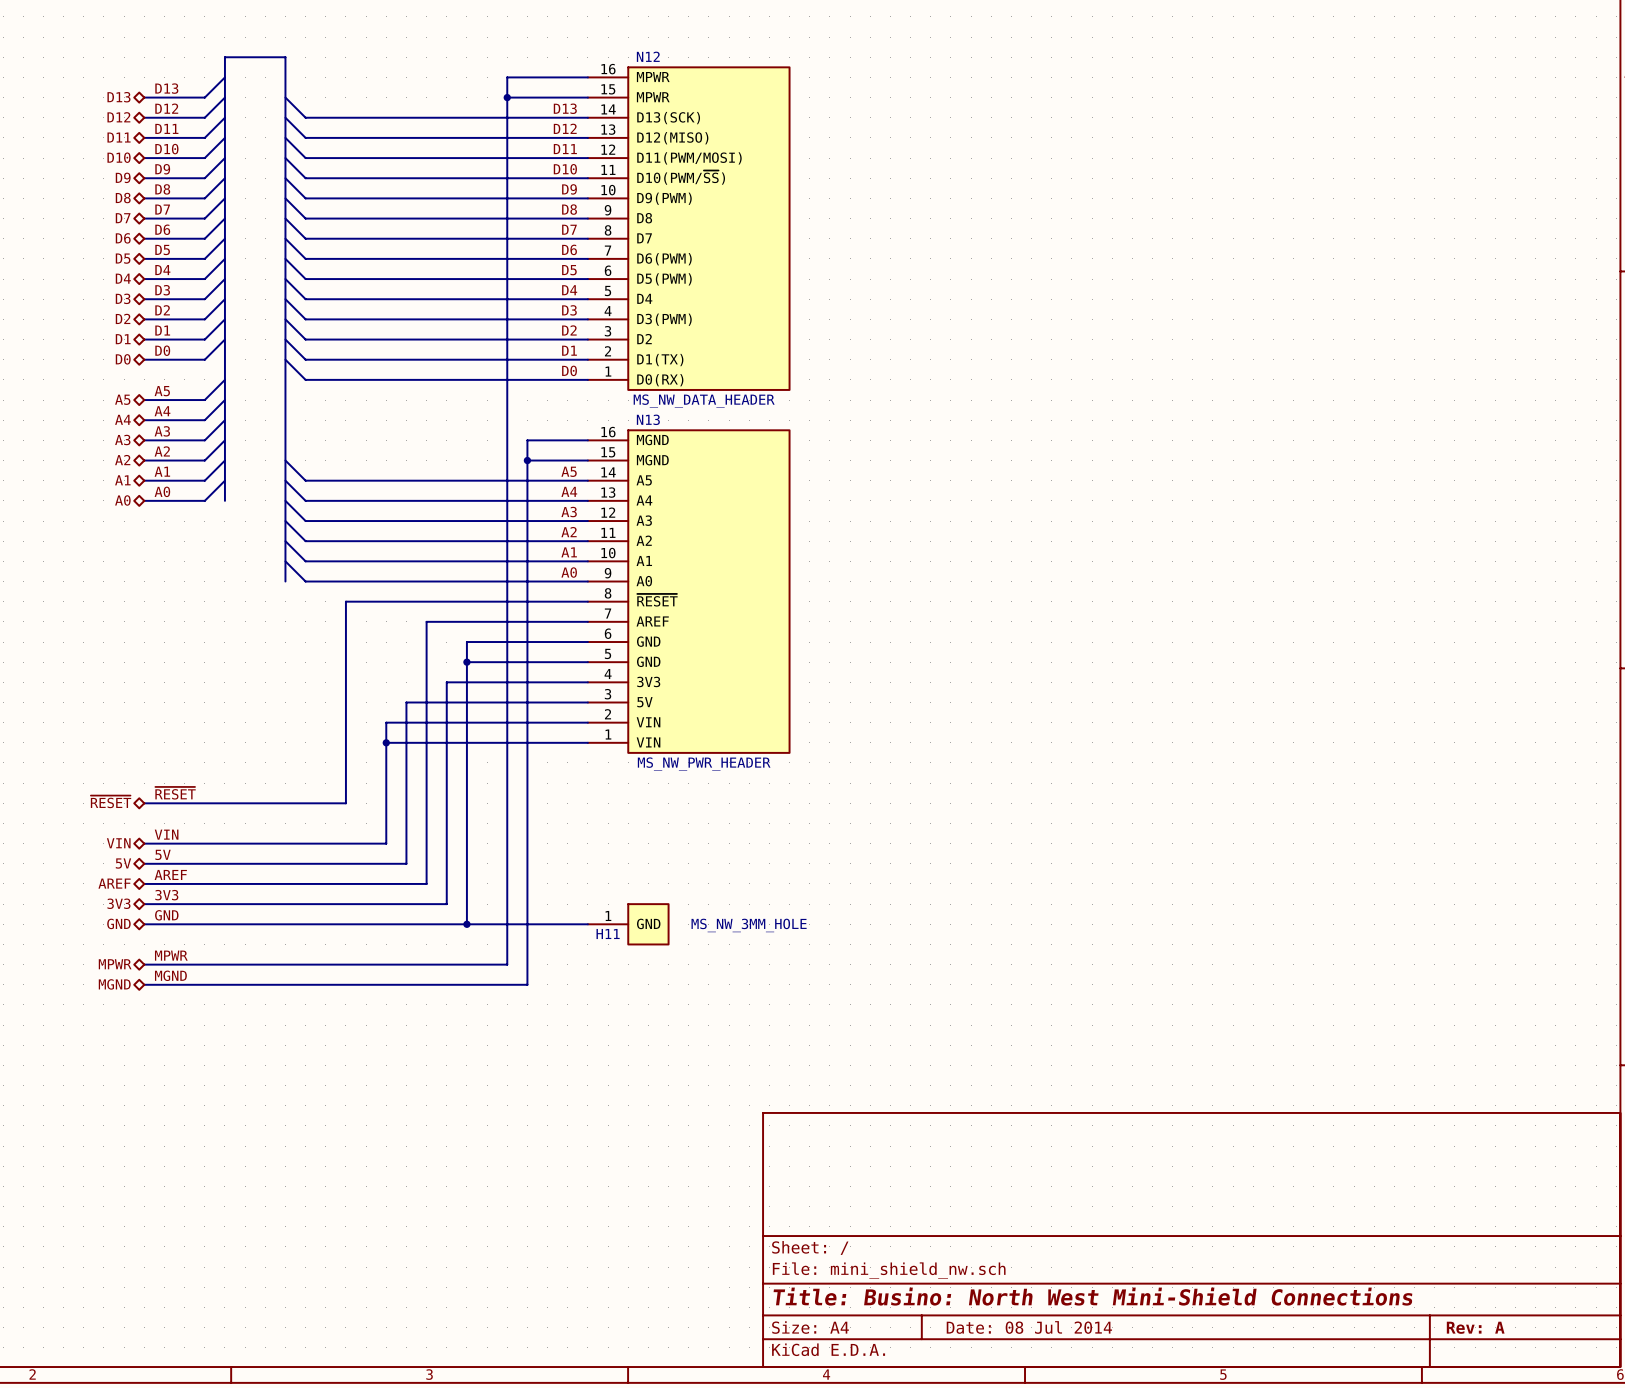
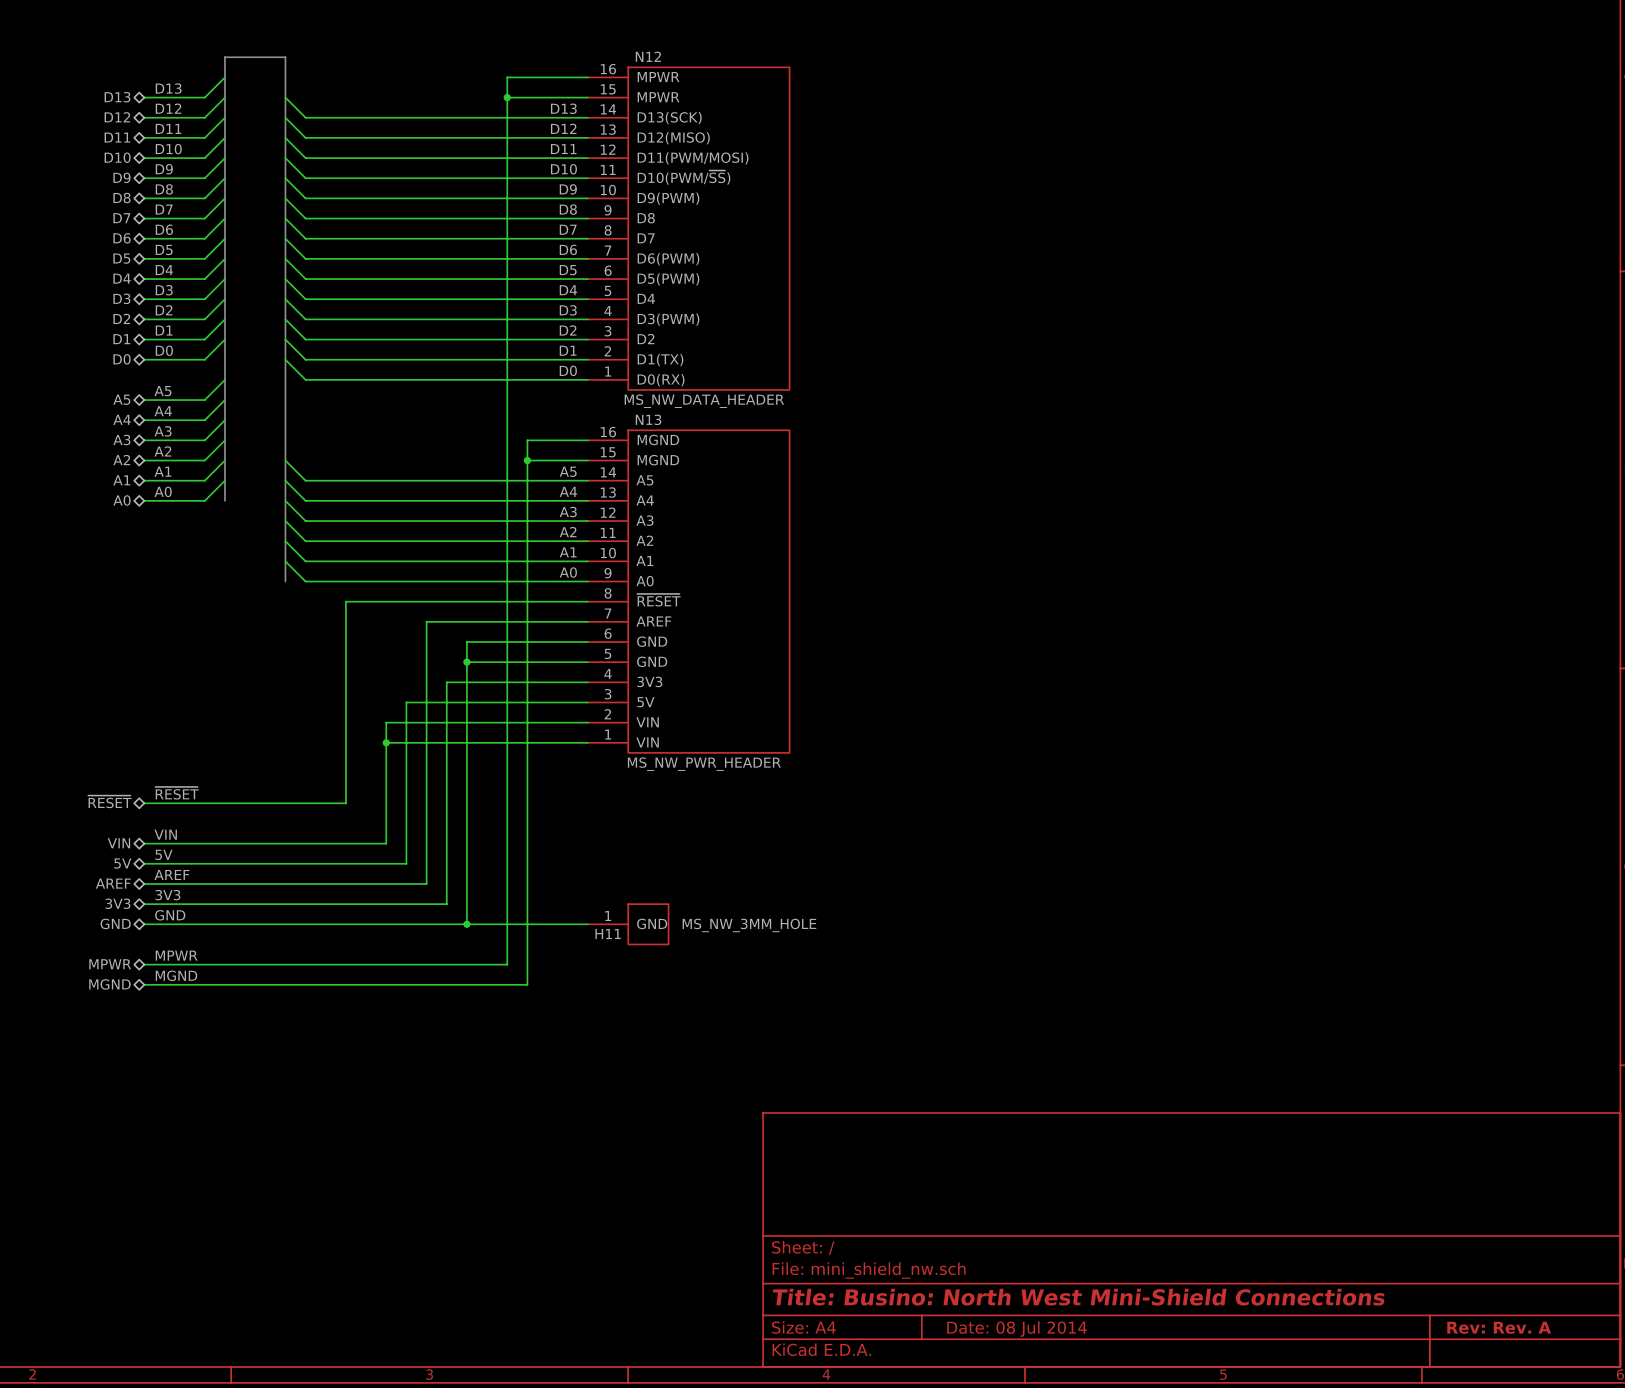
title block: Rev: A (1475, 1327) -> Rev: Rev. A (1499, 1327)

